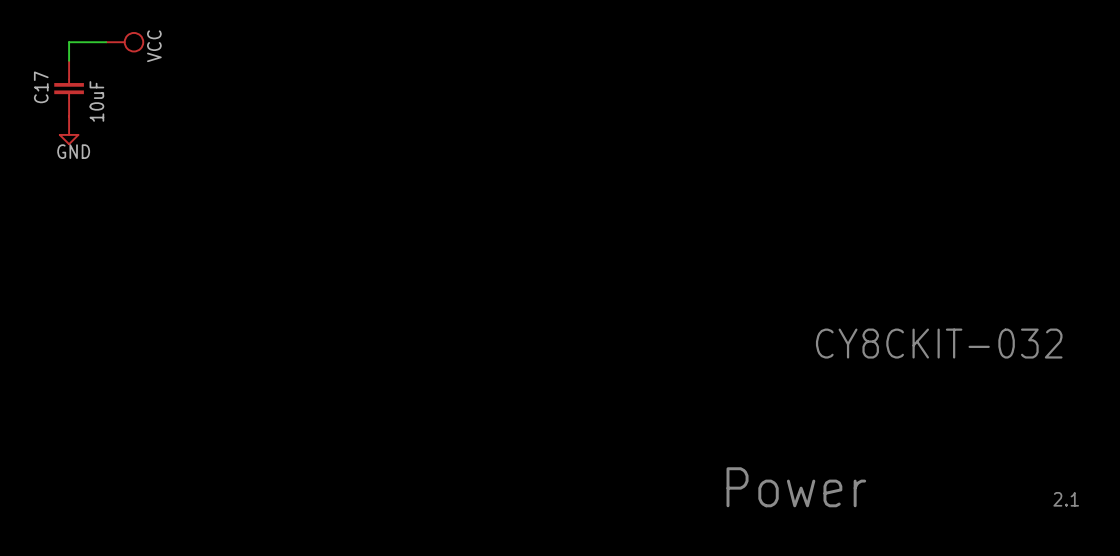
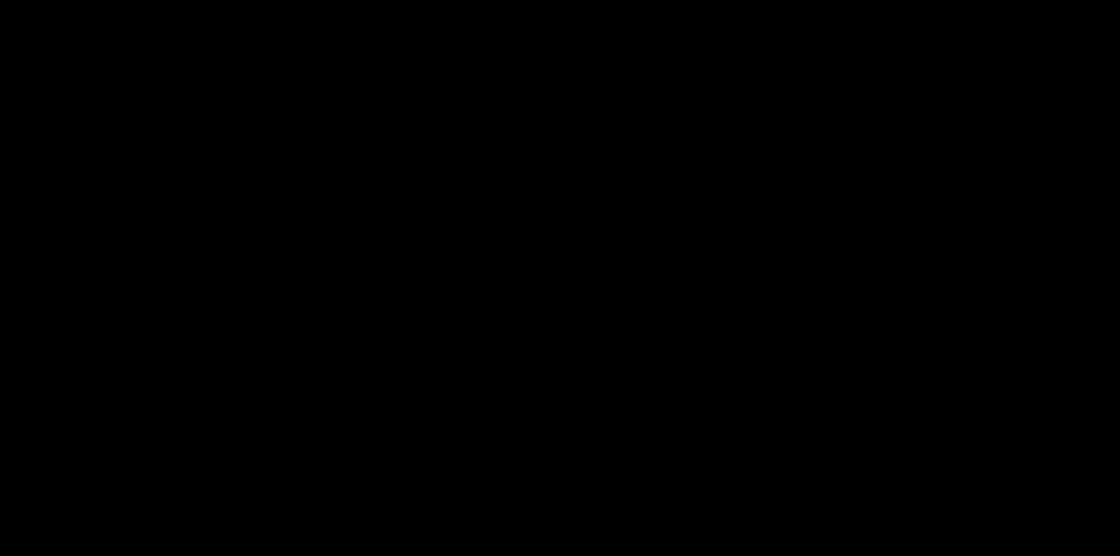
wire: (106, 42) (69, 42) (69, 60) -> none
power symbol: VCC (125, 42) -> none
C17: 10uF (69, 88) -> none
power symbol: GND (69, 130) -> none
text: CY8CKIT-032 (939, 343) -> none
text: Power (796, 487) -> none
text: 2.1 (1066, 499) -> none

